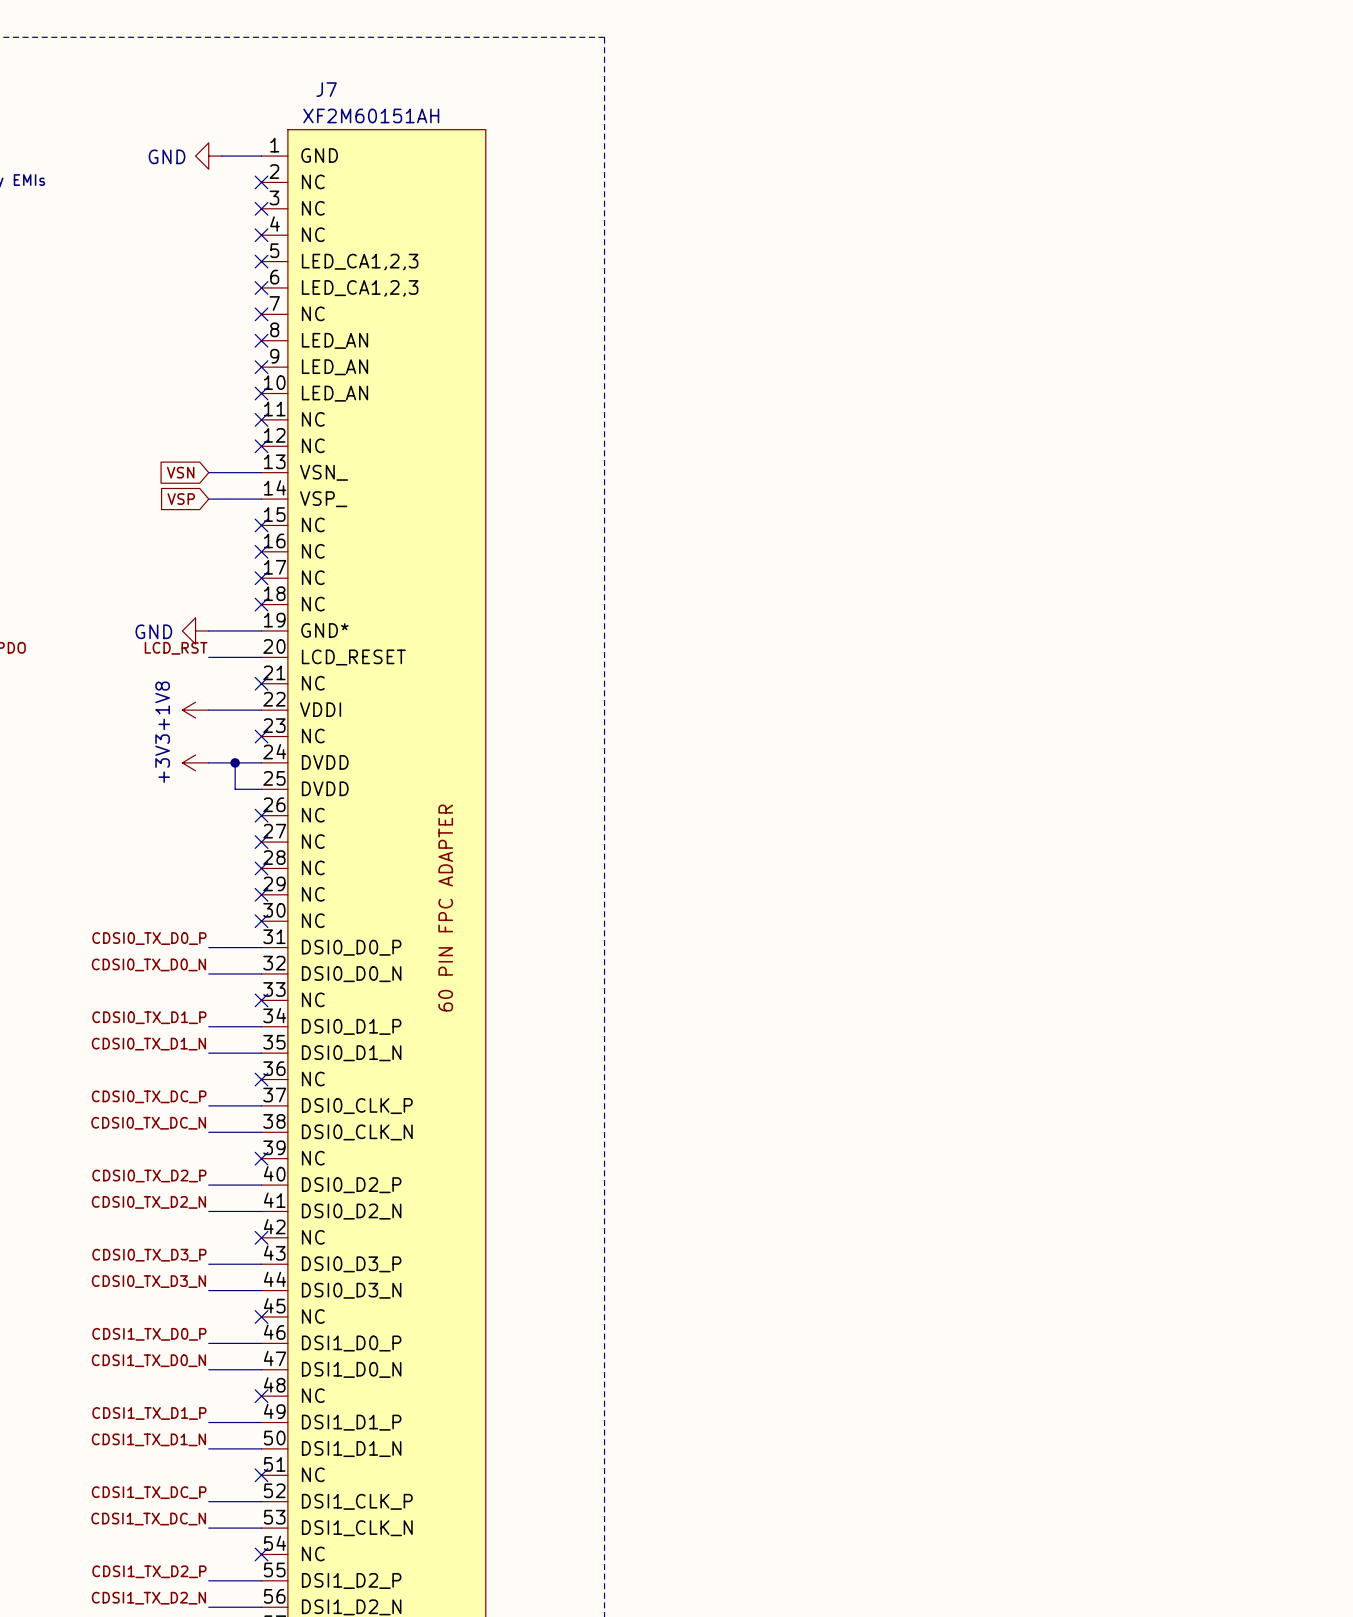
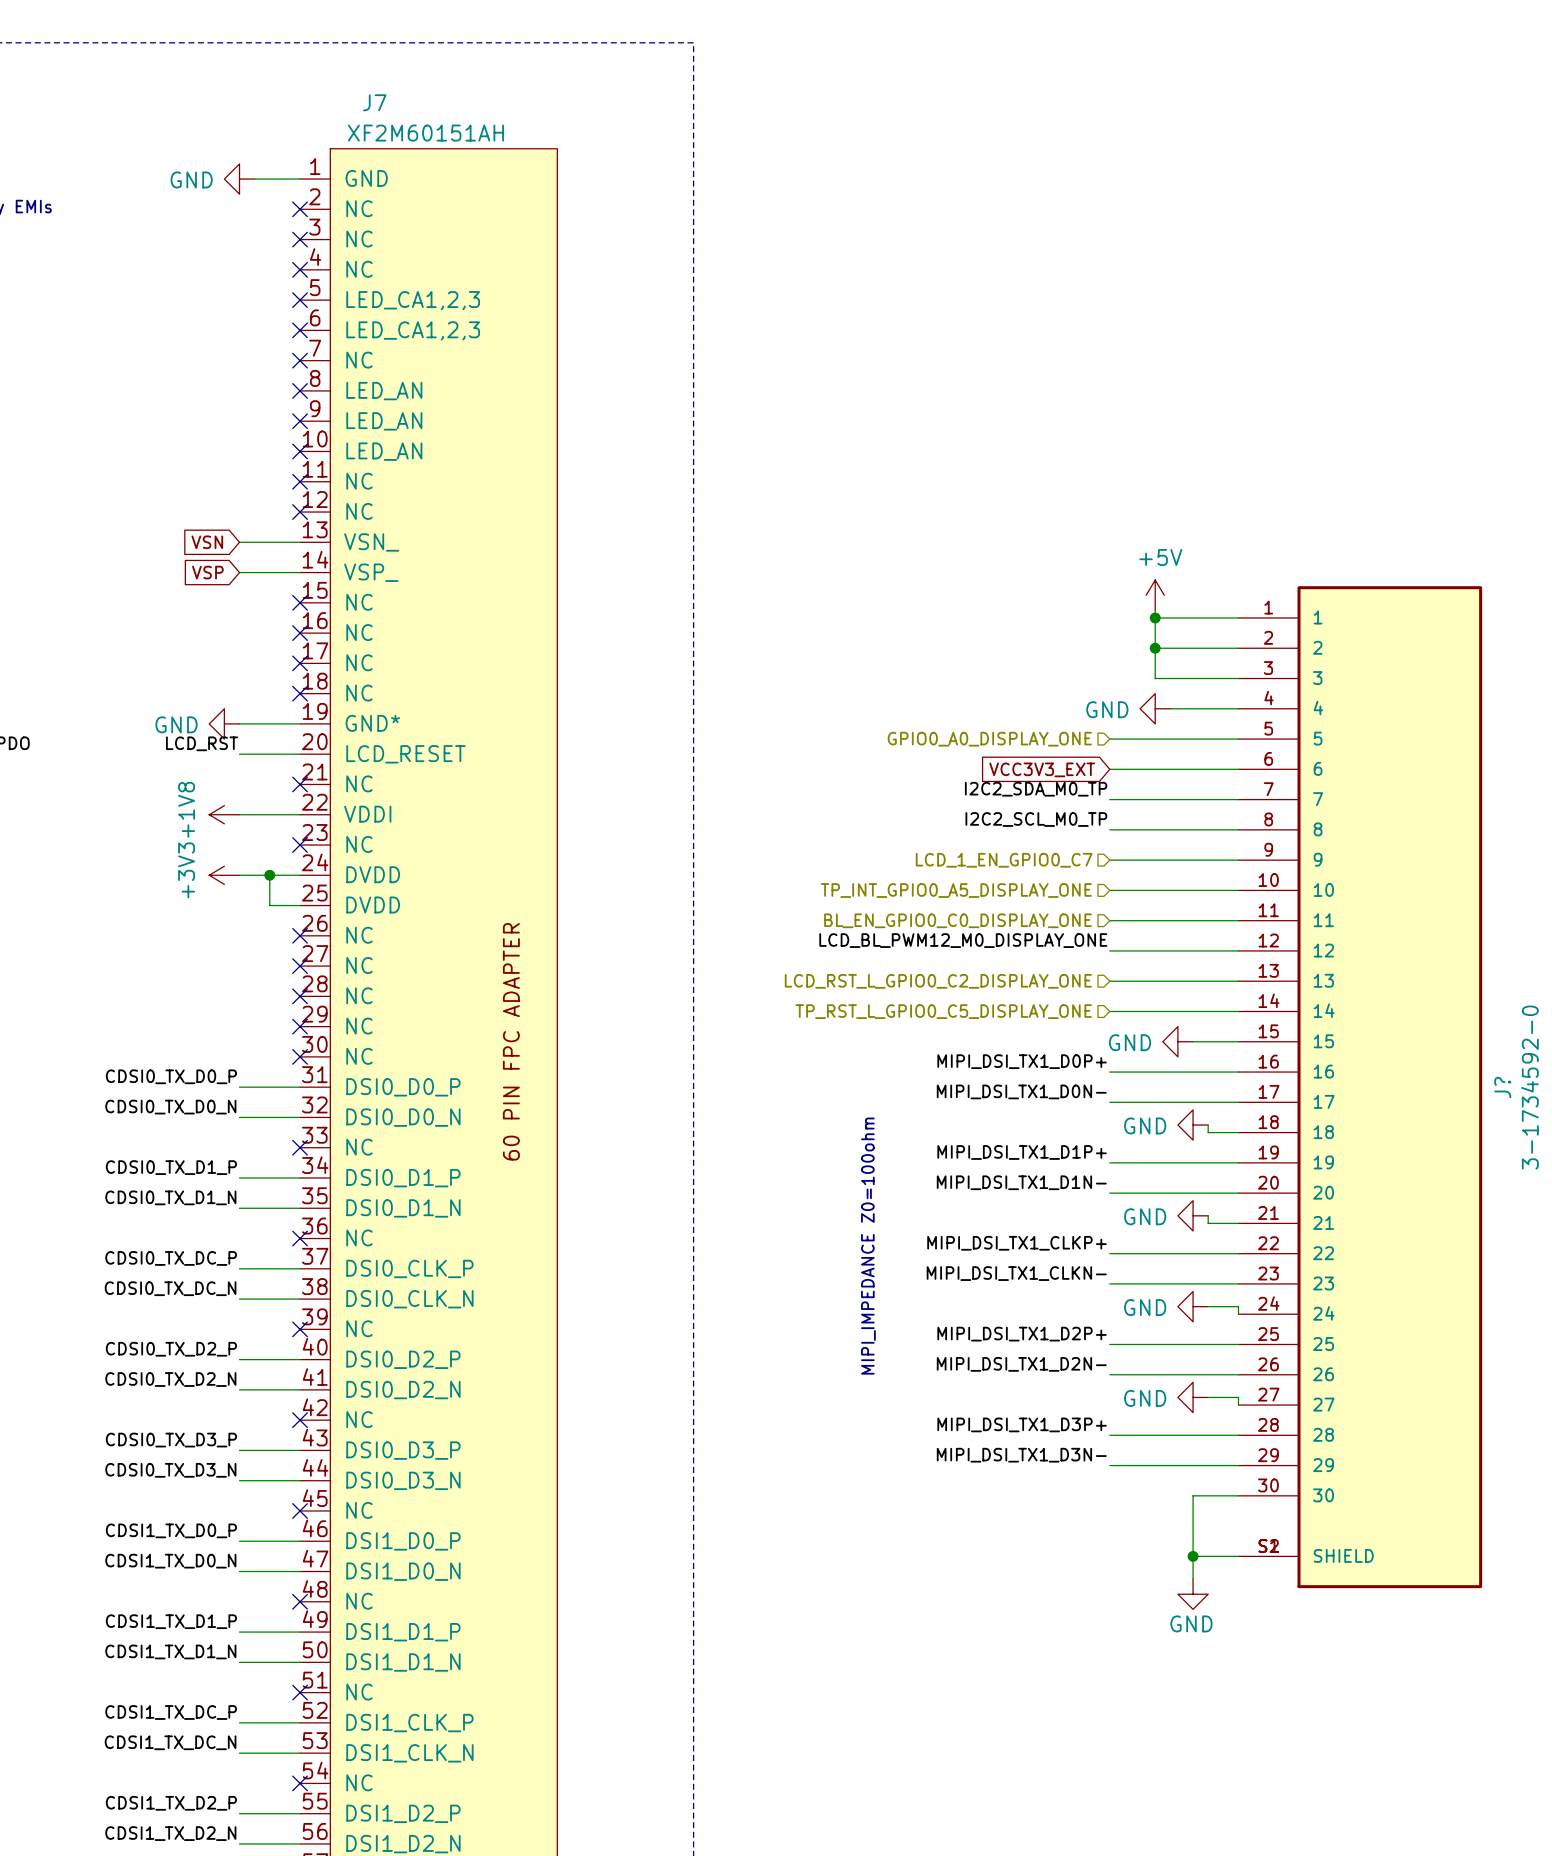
power symbol: none -> +5V (1155, 595)
wire: none -> (1155, 610) (1155, 678) (1238, 678)
wire: none -> (1155, 617) (1238, 617)
junction: none -> (1155, 617)
wire: none -> (1155, 648) (1238, 648)
junction: none -> (1155, 648)
power symbol: none -> GND (1155, 708)
wire: none -> (1170, 708) (1238, 708)
hierarchical label: none -> GPIO0_A0_DISPLAY_ONE (989, 739)
wire: none -> (1109, 739) (1238, 739)
wire: none -> (1109, 769) (1238, 769)
global label: none -> VCC3V3_EXT (1042, 769)
label: none -> I2C2_SDA_M0_TP (1036, 789)
wire: none -> (1109, 799) (1238, 799)
label: none -> I2C2_SCL_M0_TP (1036, 819)
wire: none -> (1109, 829) (1238, 829)
hierarchical label: none -> LCD_1_EN_GPIO0_C7 (1004, 860)
wire: none -> (1109, 860) (1238, 860)
hierarchical label: none -> TP_INT_GPIO0_A5_DISPLAY_ONE (956, 890)
wire: none -> (1109, 890) (1238, 890)
hierarchical label: none -> BL_EN_GPIO0_C0_DISPLAY_ONE (958, 920)
wire: none -> (1109, 920) (1238, 920)
label: none -> LCD_BL_PWM12_M0_DISPLAY_ONE (963, 940)
wire: none -> (1109, 950) (1238, 950)
hierarchical label: none -> LCD_RST_L_GPIO0_C2_DISPLAY_ONE (938, 981)
wire: none -> (1109, 981) (1238, 981)
hierarchical label: none -> TP_RST_L_GPIO0_C5_DISPLAY_ONE (943, 1011)
wire: none -> (1109, 1011) (1238, 1011)
power symbol: none -> GND (1177, 1041)
wire: none -> (1193, 1041) (1238, 1041)
label: none -> MIPI_DSI_TX1_D0P+ (1022, 1061)
wire: none -> (1109, 1072) (1238, 1072)
J?: none -> 3-1734592-0 (1360, 1087)
label: none -> MIPI_DSI_TX1_D0N- (1021, 1091)
wire: none -> (1109, 1102) (1238, 1102)
power symbol: none -> GND (1193, 1125)
wire: none -> (1208, 1125) (1208, 1132) (1238, 1132)
label: none -> MIPI_DSI_TX1_D1P+ (1022, 1152)
wire: none -> (1109, 1162) (1238, 1162)
label: none -> MIPI_DSI_TX1_D1N- (1021, 1182)
wire: none -> (1109, 1193) (1238, 1193)
power symbol: none -> GND (1193, 1215)
wire: none -> (1208, 1215) (1208, 1223) (1238, 1223)
label: none -> MIPI_DSI_TX1_CLKP+ (1016, 1243)
text: none -> MIPI_IMPEDANCE Z0=100ohm (868, 1246)
wire: none -> (1109, 1253) (1238, 1253)
label: none -> MIPI_DSI_TX1_CLKN- (1016, 1273)
wire: none -> (1109, 1283) (1238, 1283)
power symbol: none -> GND (1193, 1306)
wire: none -> (1208, 1306) (1238, 1306) (1238, 1314)
label: none -> MIPI_DSI_TX1_D2P+ (1022, 1334)
wire: none -> (1109, 1344) (1238, 1344)
label: none -> MIPI_DSI_TX1_D2N- (1021, 1364)
wire: none -> (1109, 1374) (1238, 1374)
power symbol: none -> GND (1193, 1397)
wire: none -> (1208, 1397) (1238, 1397) (1238, 1405)
label: none -> MIPI_DSI_TX1_D3P+ (1022, 1424)
wire: none -> (1109, 1435) (1238, 1435)
label: none -> MIPI_DSI_TX1_D3N- (1021, 1455)
wire: none -> (1109, 1465) (1238, 1465)
wire: none -> (1238, 1495) (1193, 1495) (1193, 1579)
wire: none -> (1193, 1556) (1238, 1556)
junction: none -> (1193, 1556)
power symbol: none -> GND (1193, 1594)

